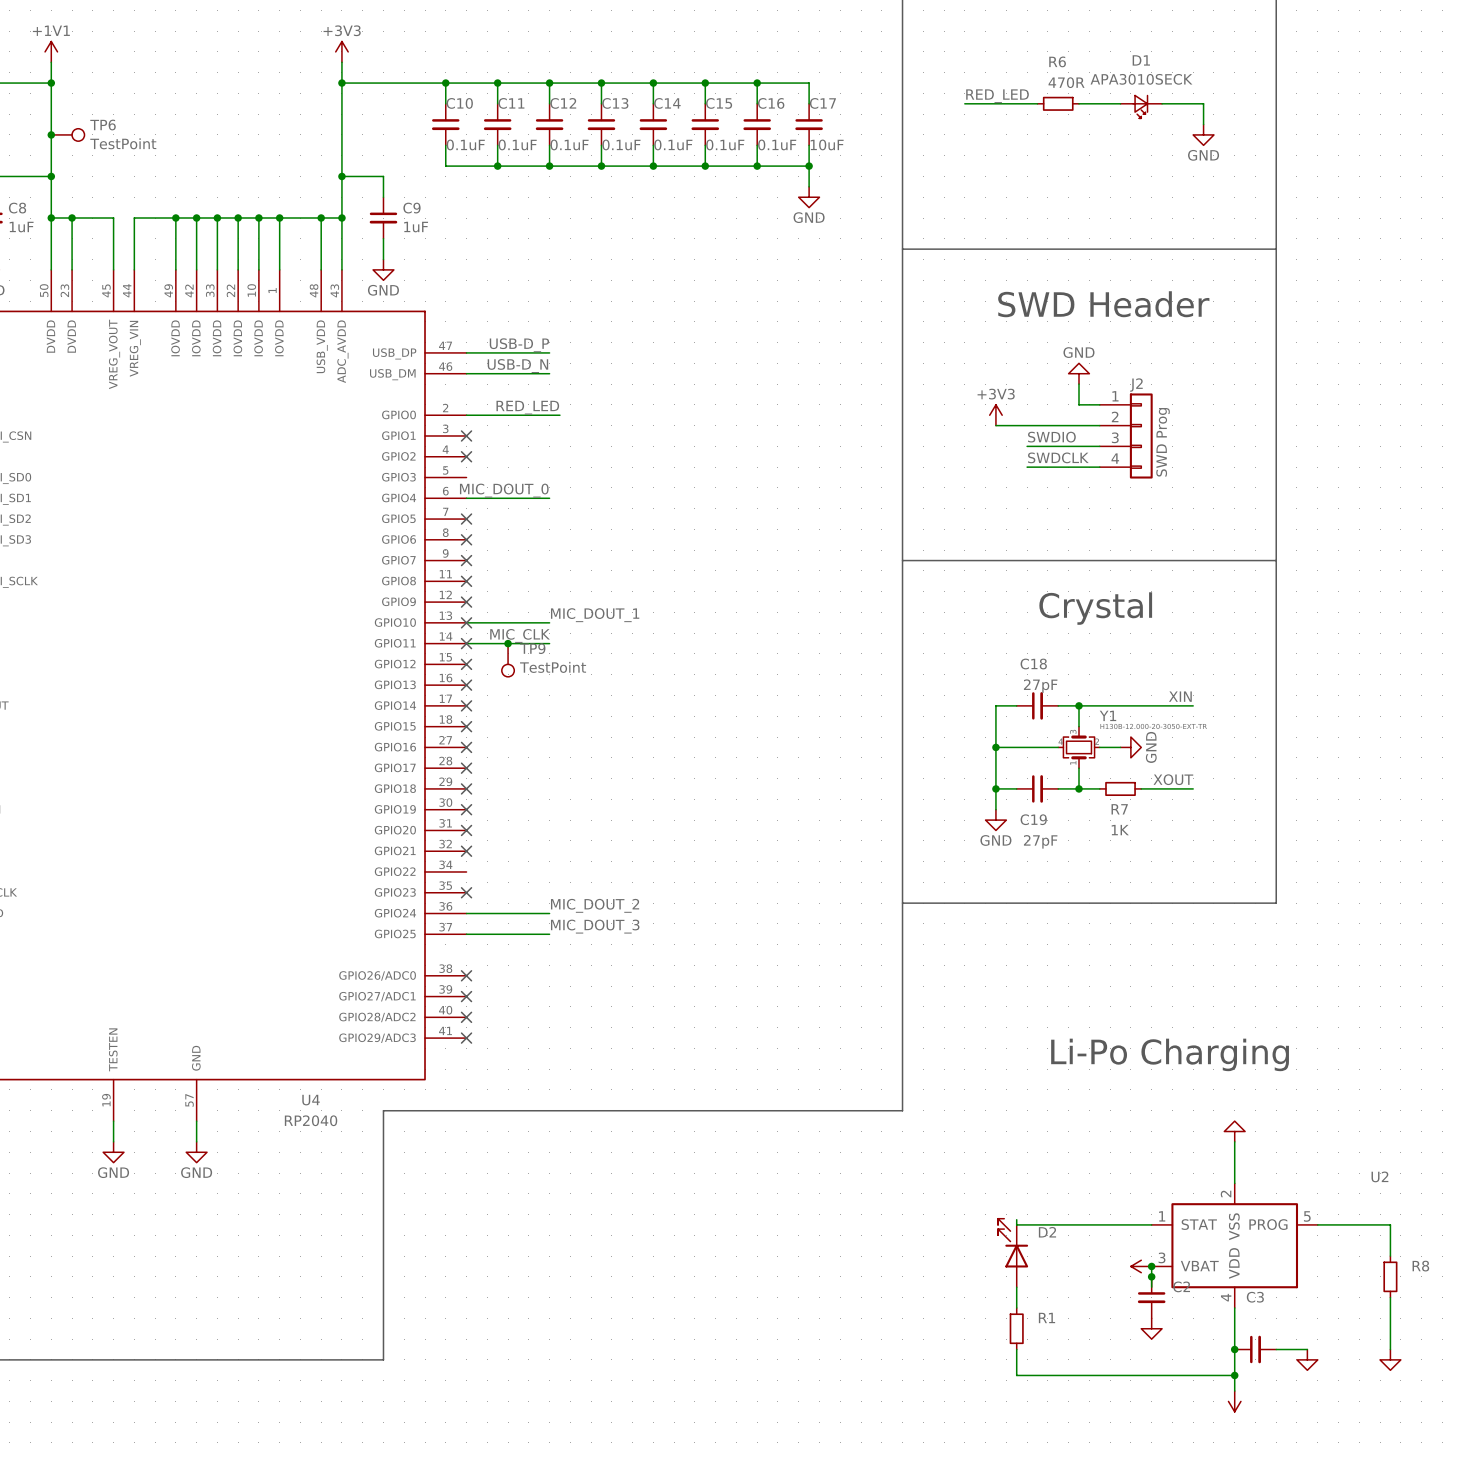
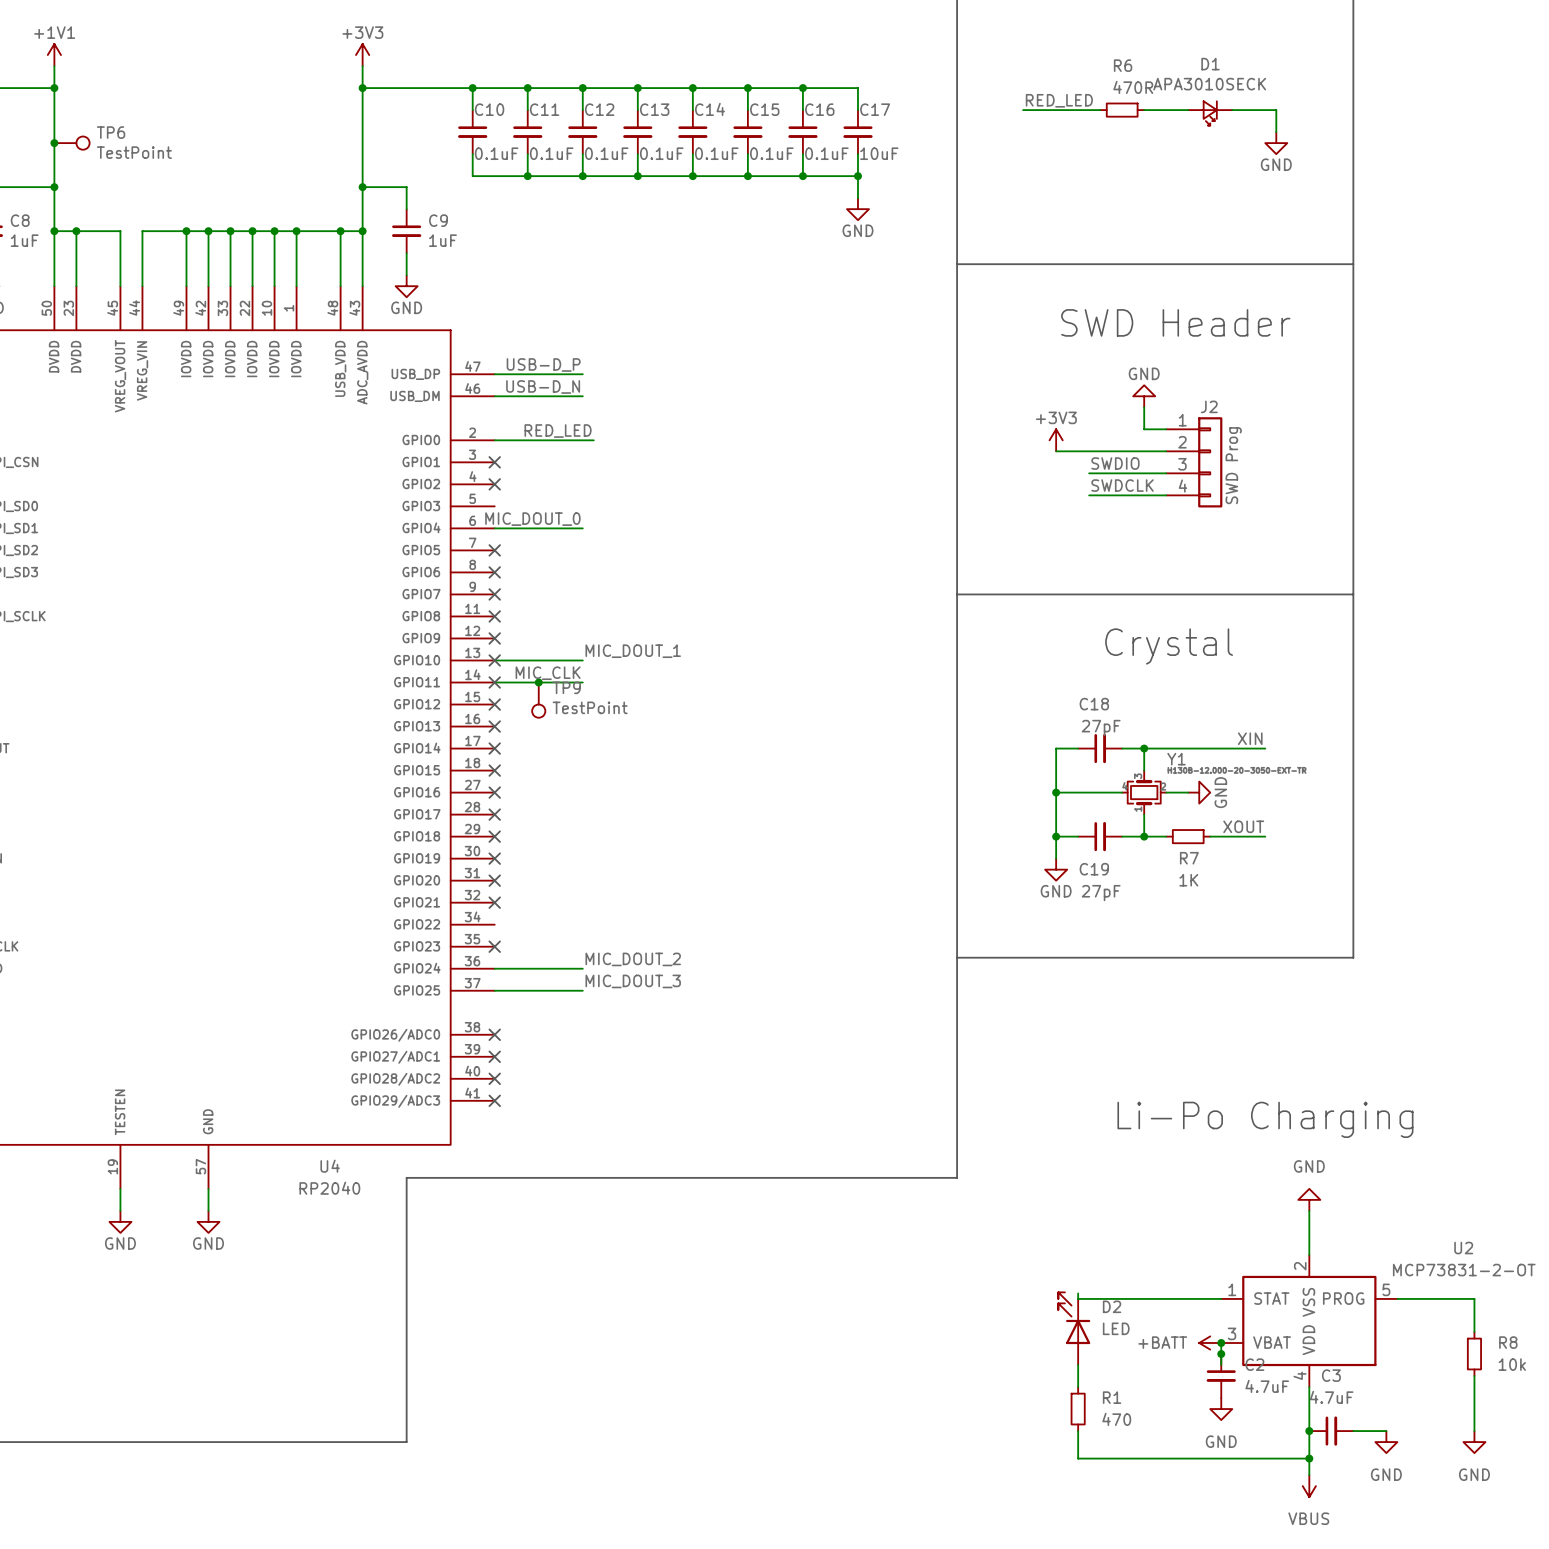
power symbol text: none -> GND (1309, 1166)
U2 value: none -> MCP73831-2-OT (1464, 1270)
D2 value: none -> LED (1116, 1328)
power symbol text: none -> +BATT (1162, 1342)
R8 value: none -> 10k (1512, 1364)
C2 value: none -> 4.7uF (1267, 1386)
C3 value: none -> 4.7uF (1331, 1397)
R1 value: none -> 470 (1116, 1419)
power symbol text: none -> GND (1221, 1441)
power symbol text: none -> GND (1386, 1474)
power symbol text: none -> GND (1474, 1474)
power symbol text: none -> VBUS (1308, 1518)

